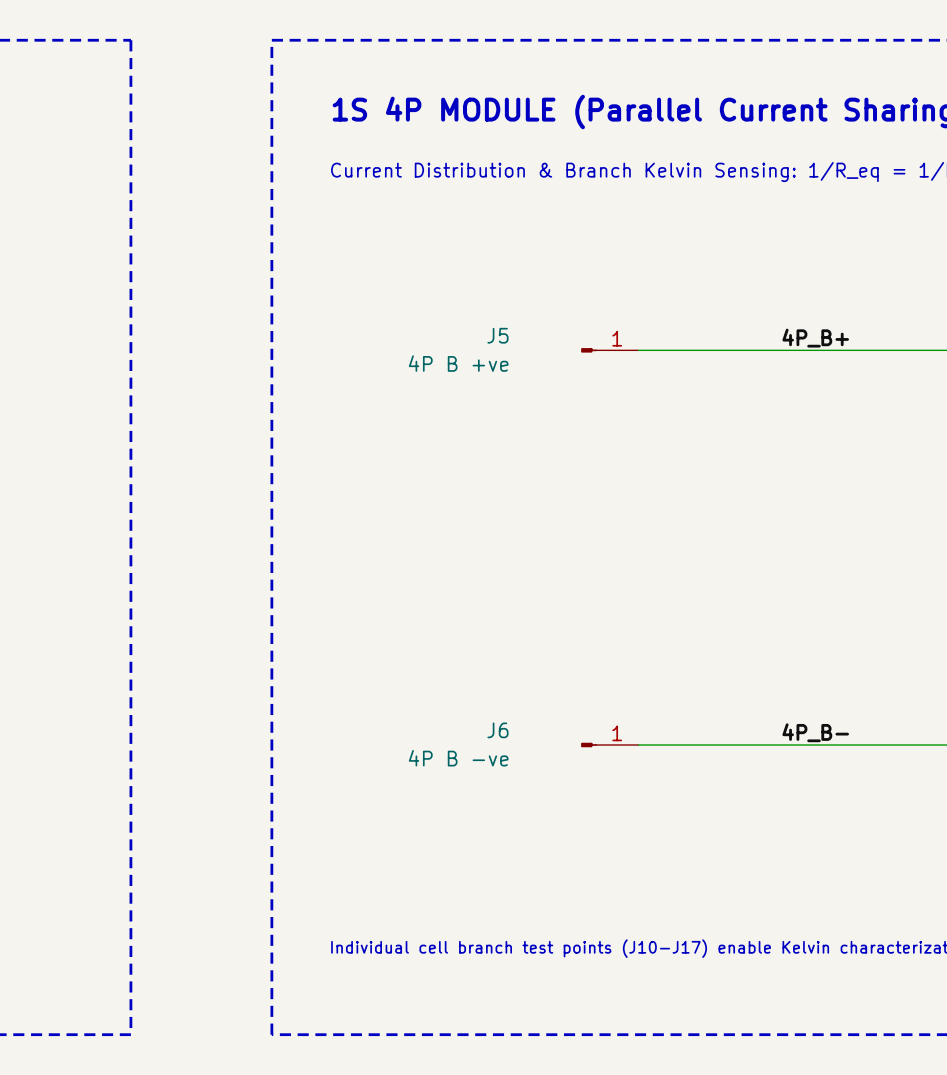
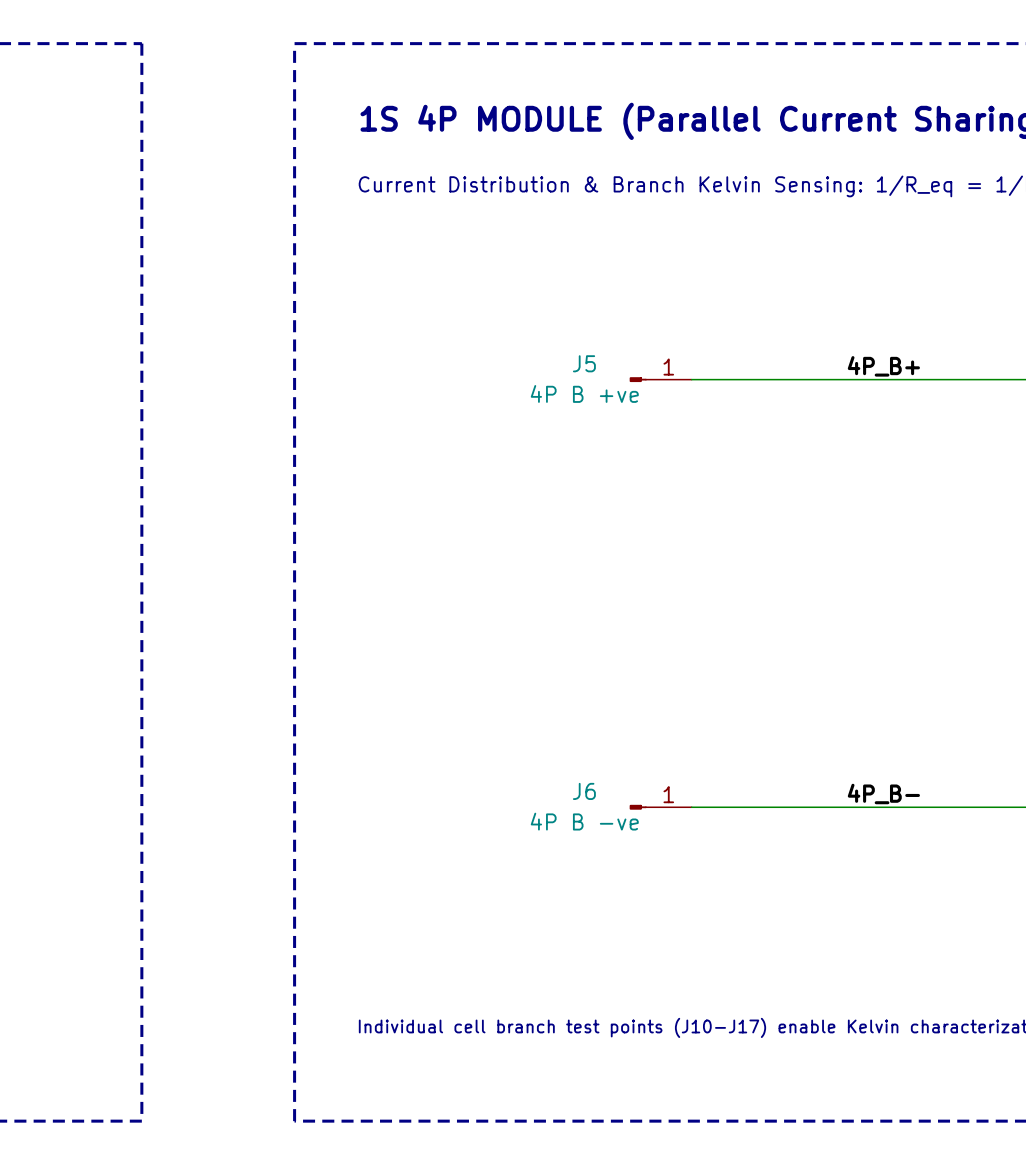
J5 name position: J5 (497, 335) -> J5 (584, 363)
J5 value position: 4P B +ve (458, 363) -> 4P B +ve (584, 393)
J6 name position: J6 (497, 730) -> J6 (584, 791)
J6 value position: 4P B -ve (458, 758) -> 4P B -ve (584, 821)

